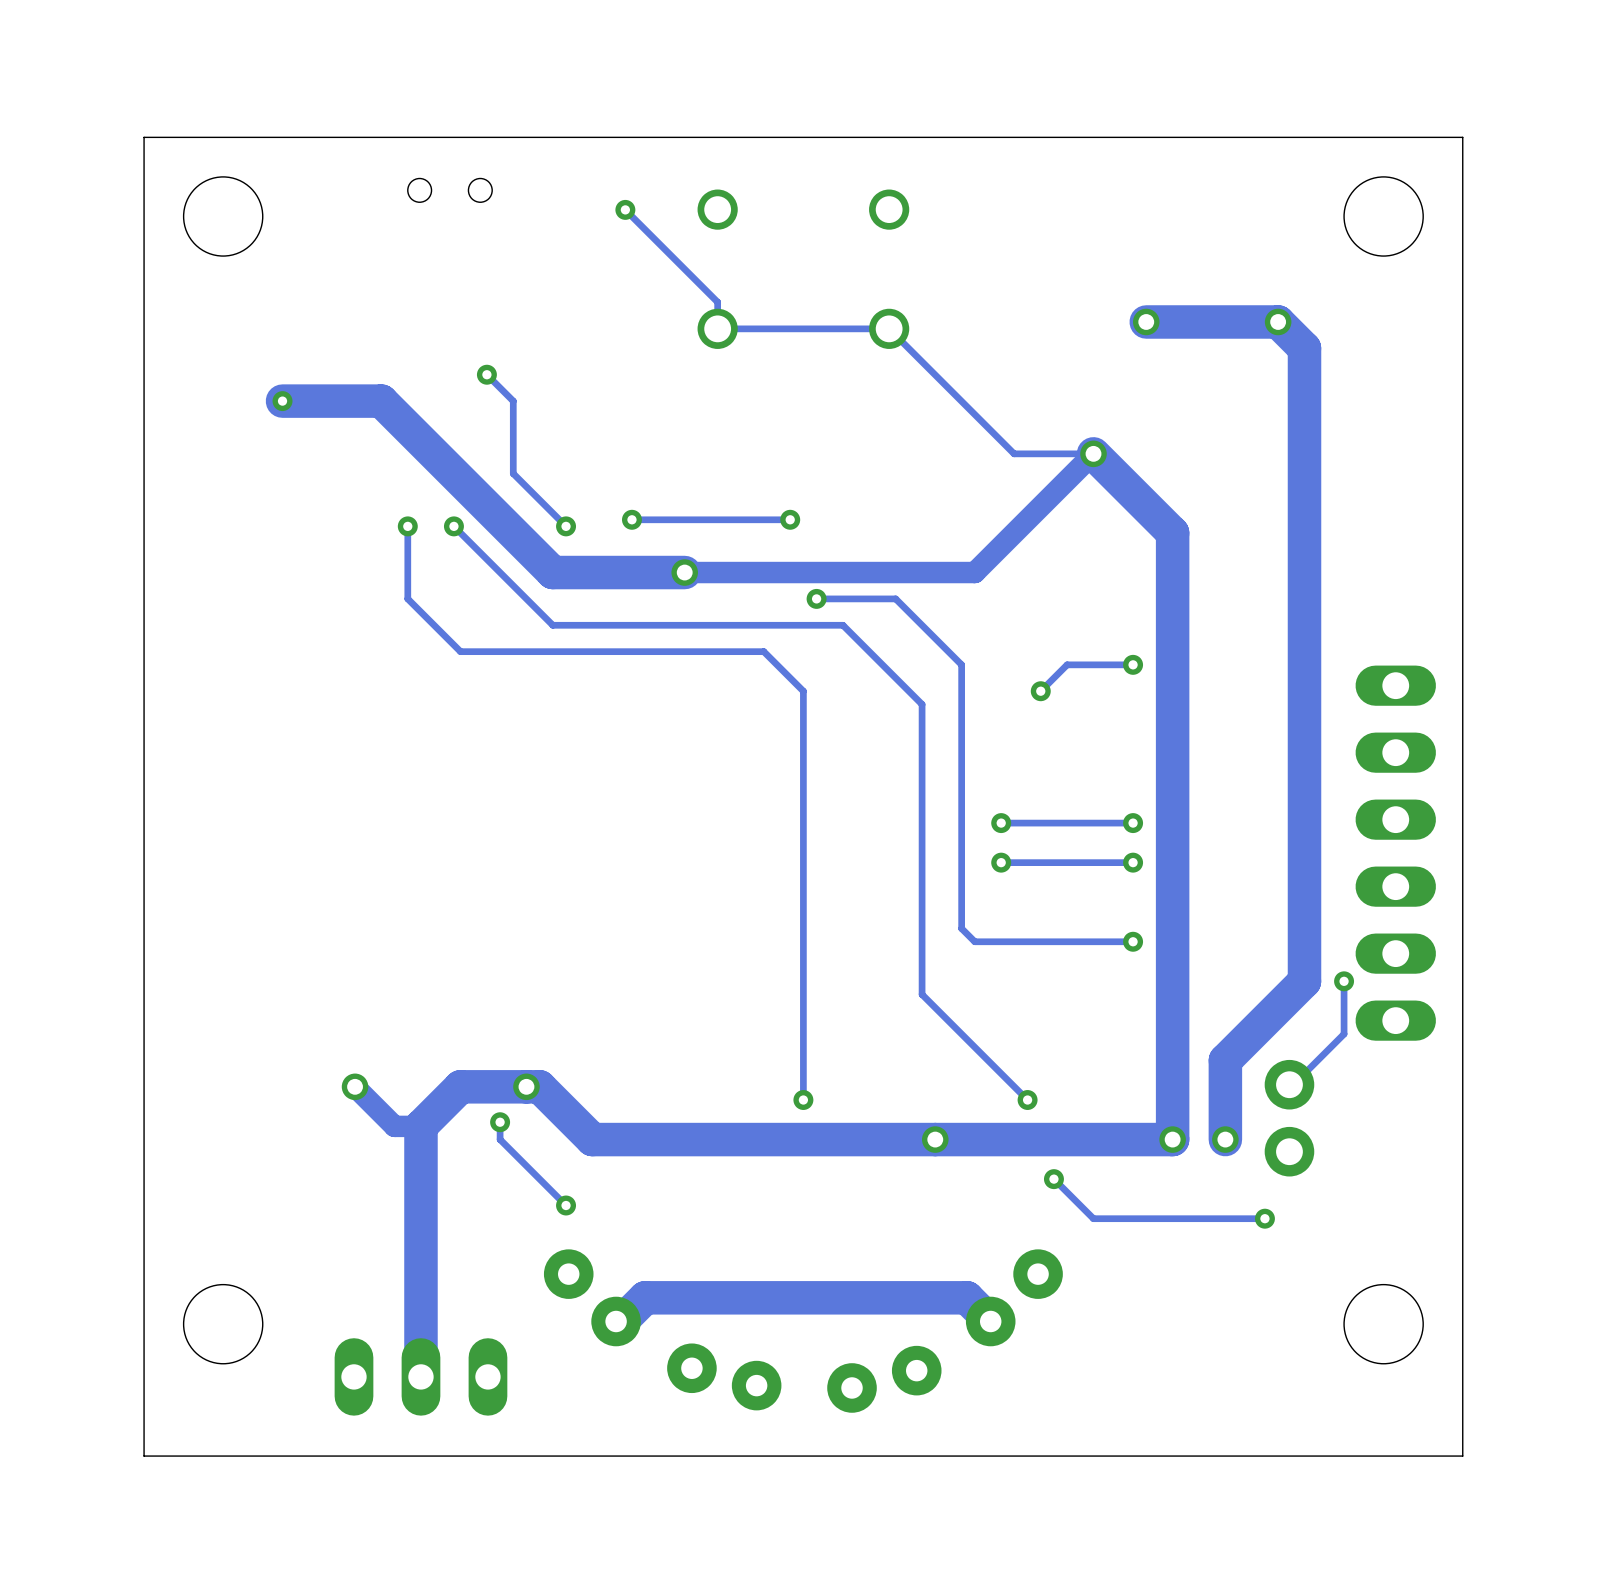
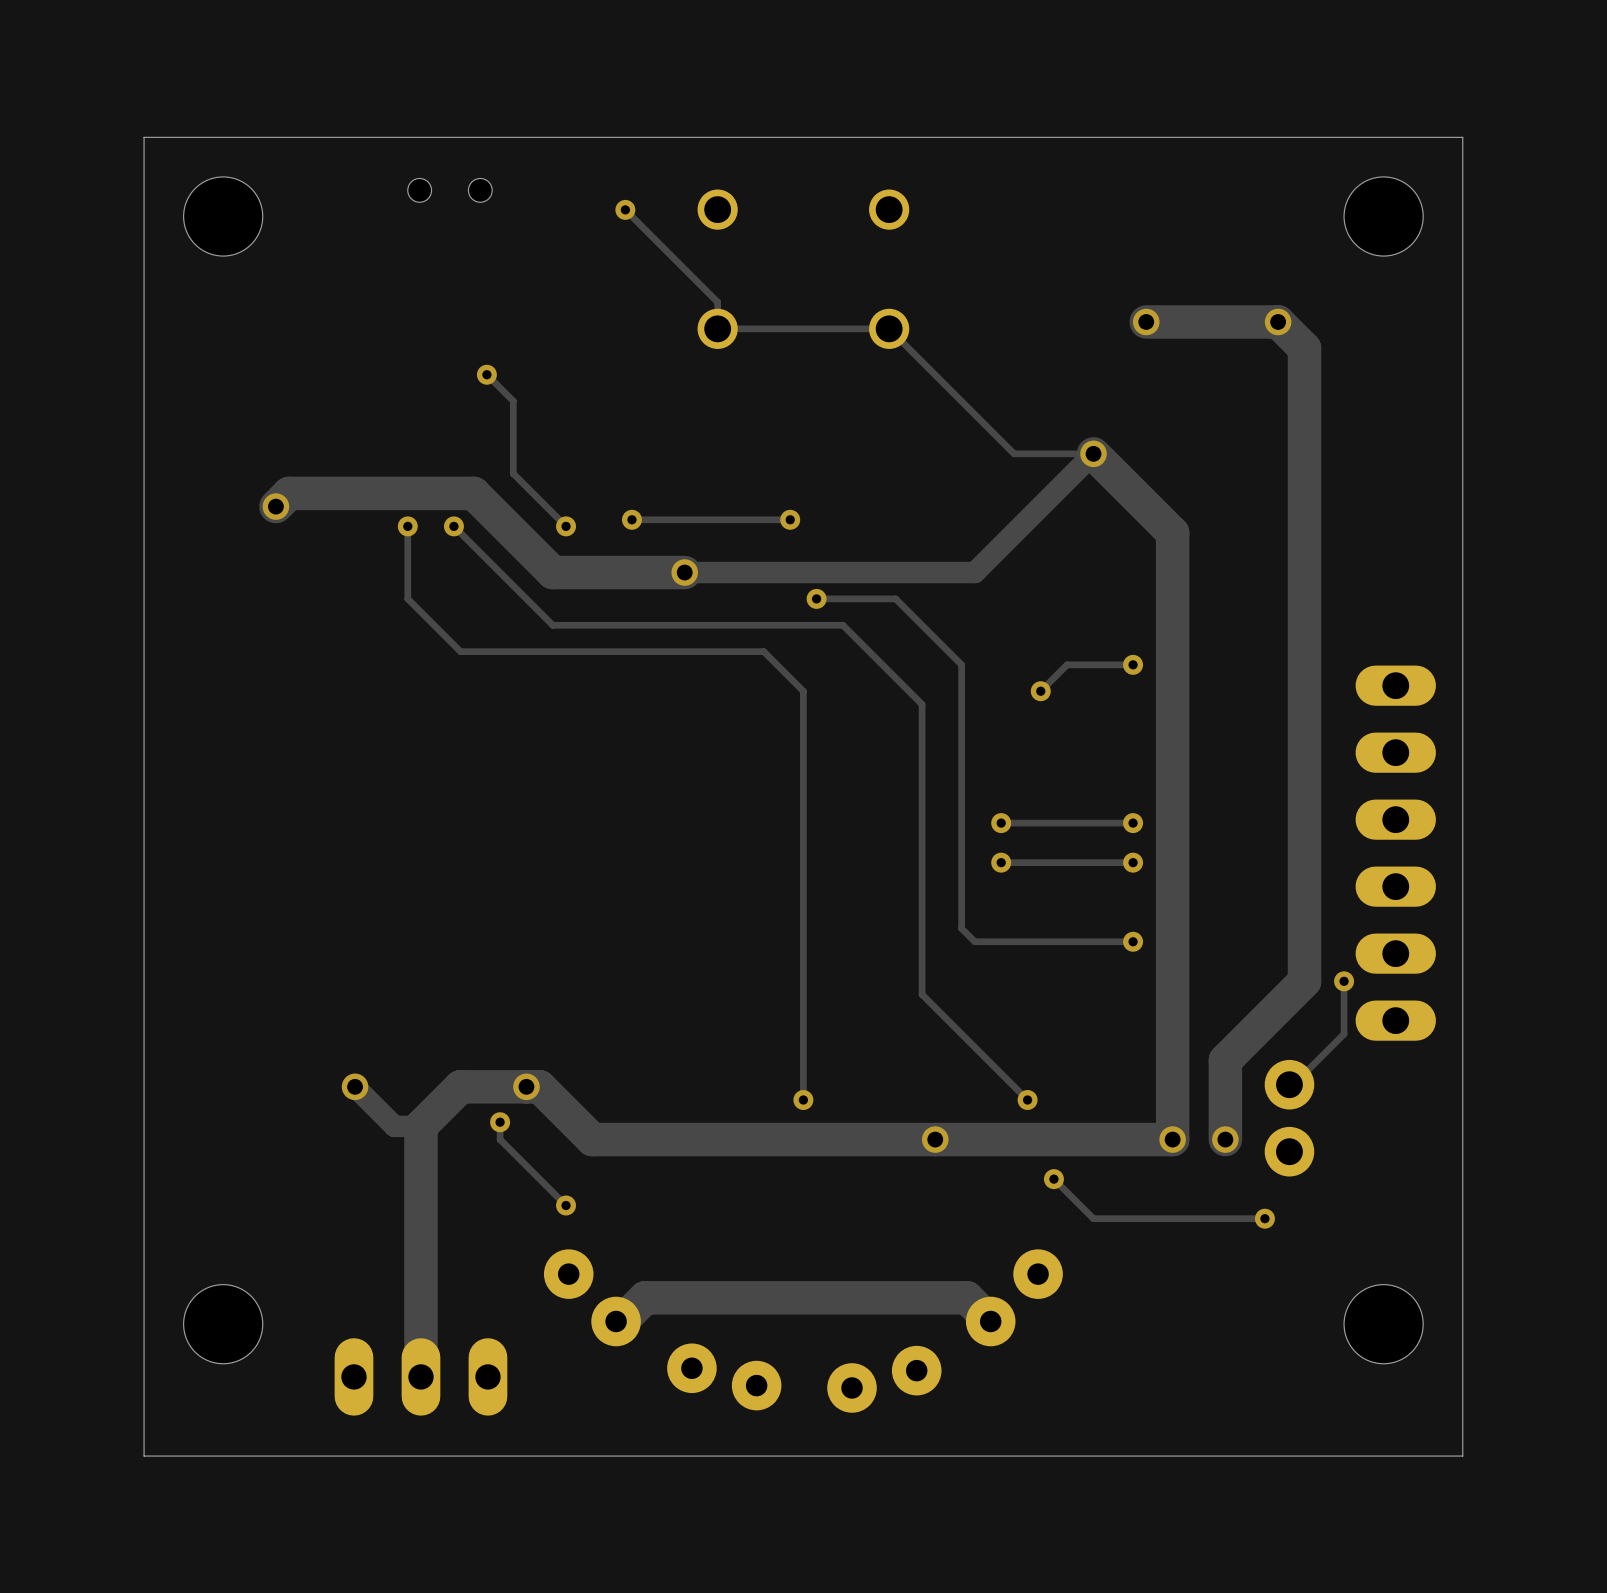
track: (282, 401) (381, 401) (473, 493) -> (275, 506) (289, 493) (473, 493)
via: (282, 401) -> none
via: none -> (275, 506)

